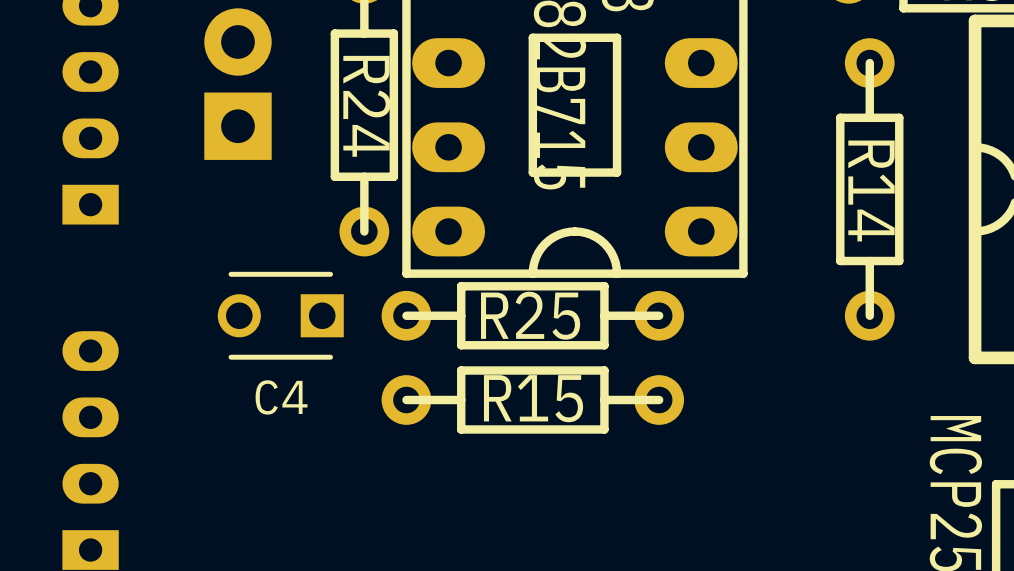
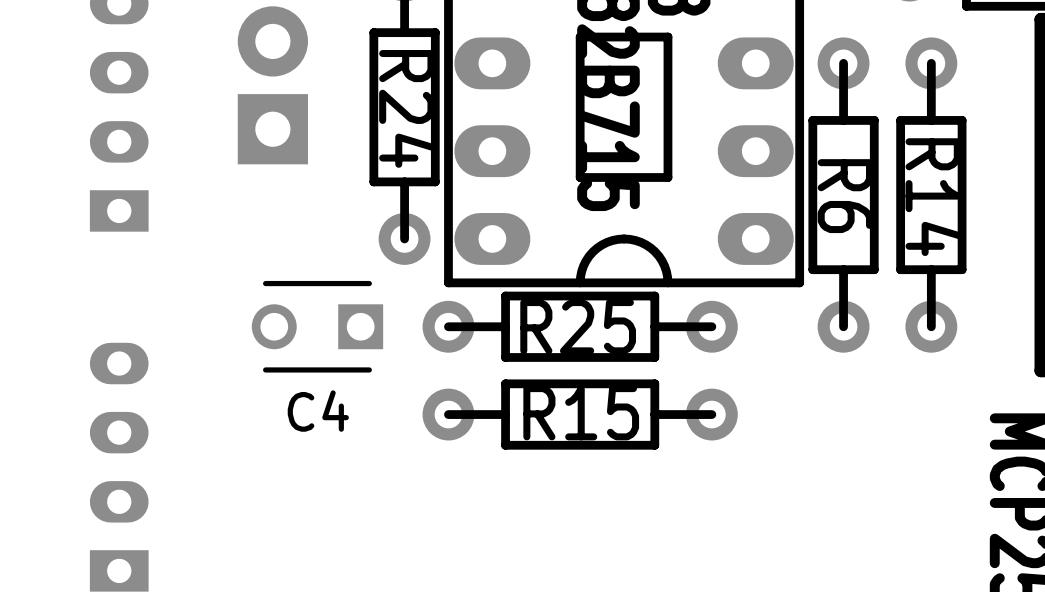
R6: none -> (843, 195)

